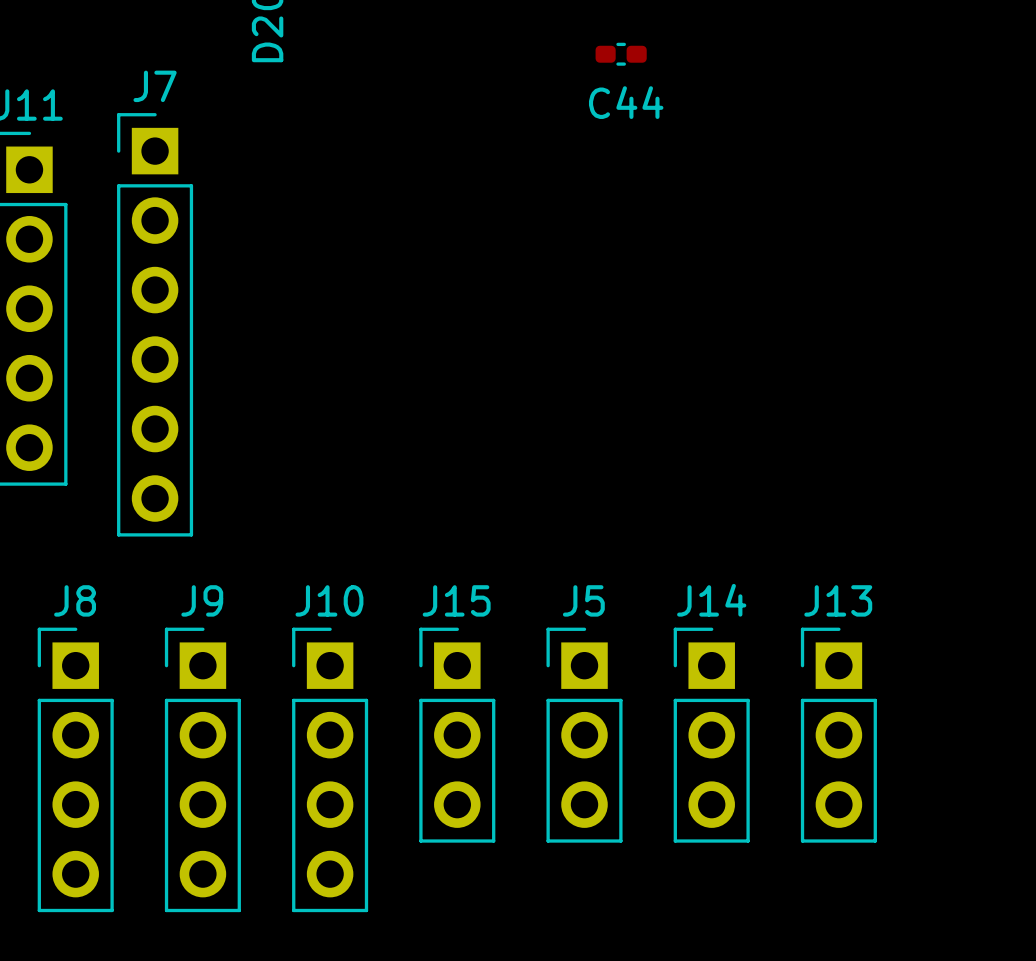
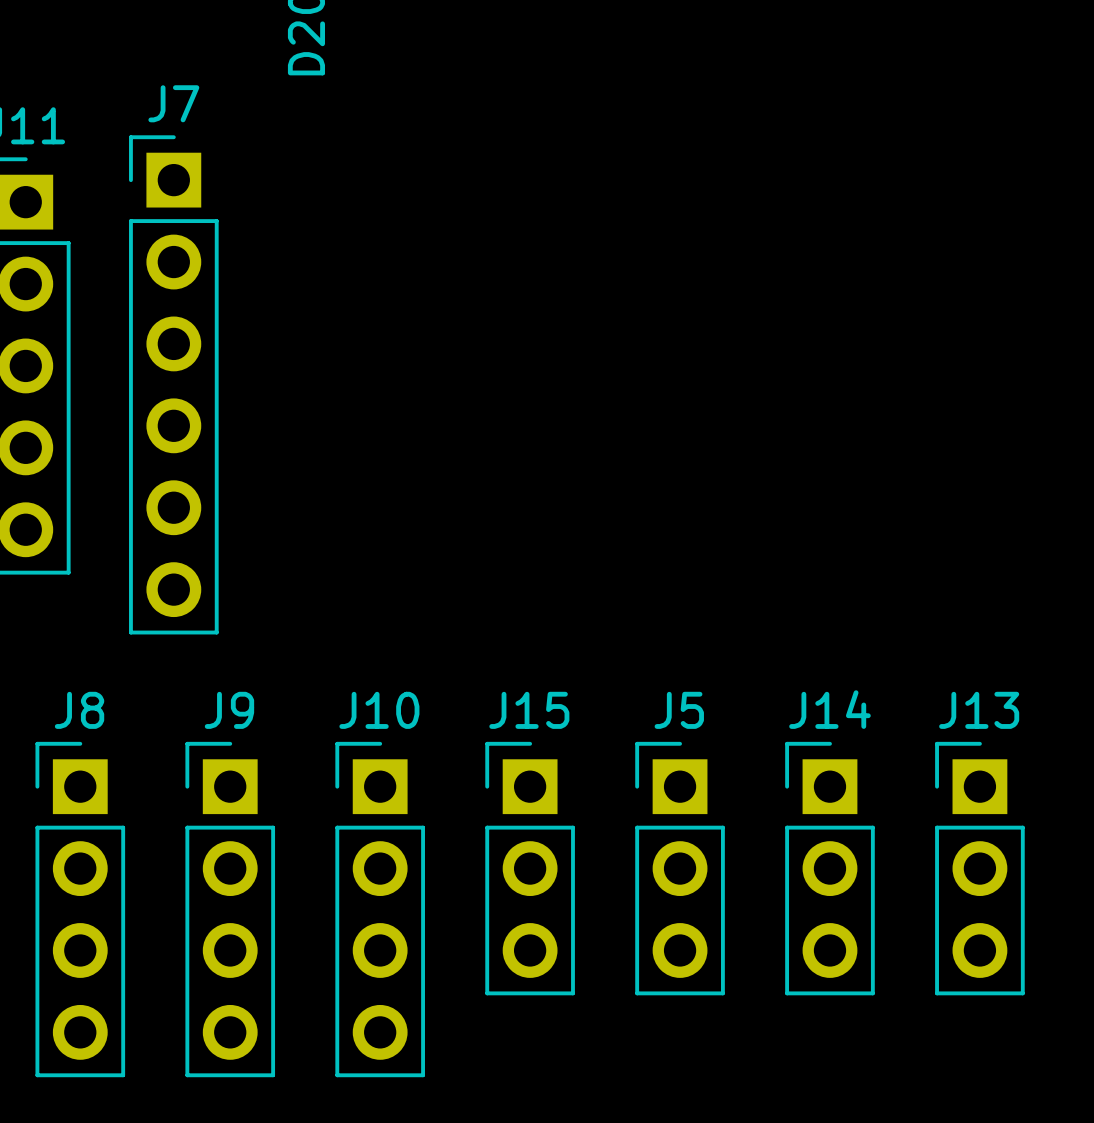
C44: (621, 54) -> none

